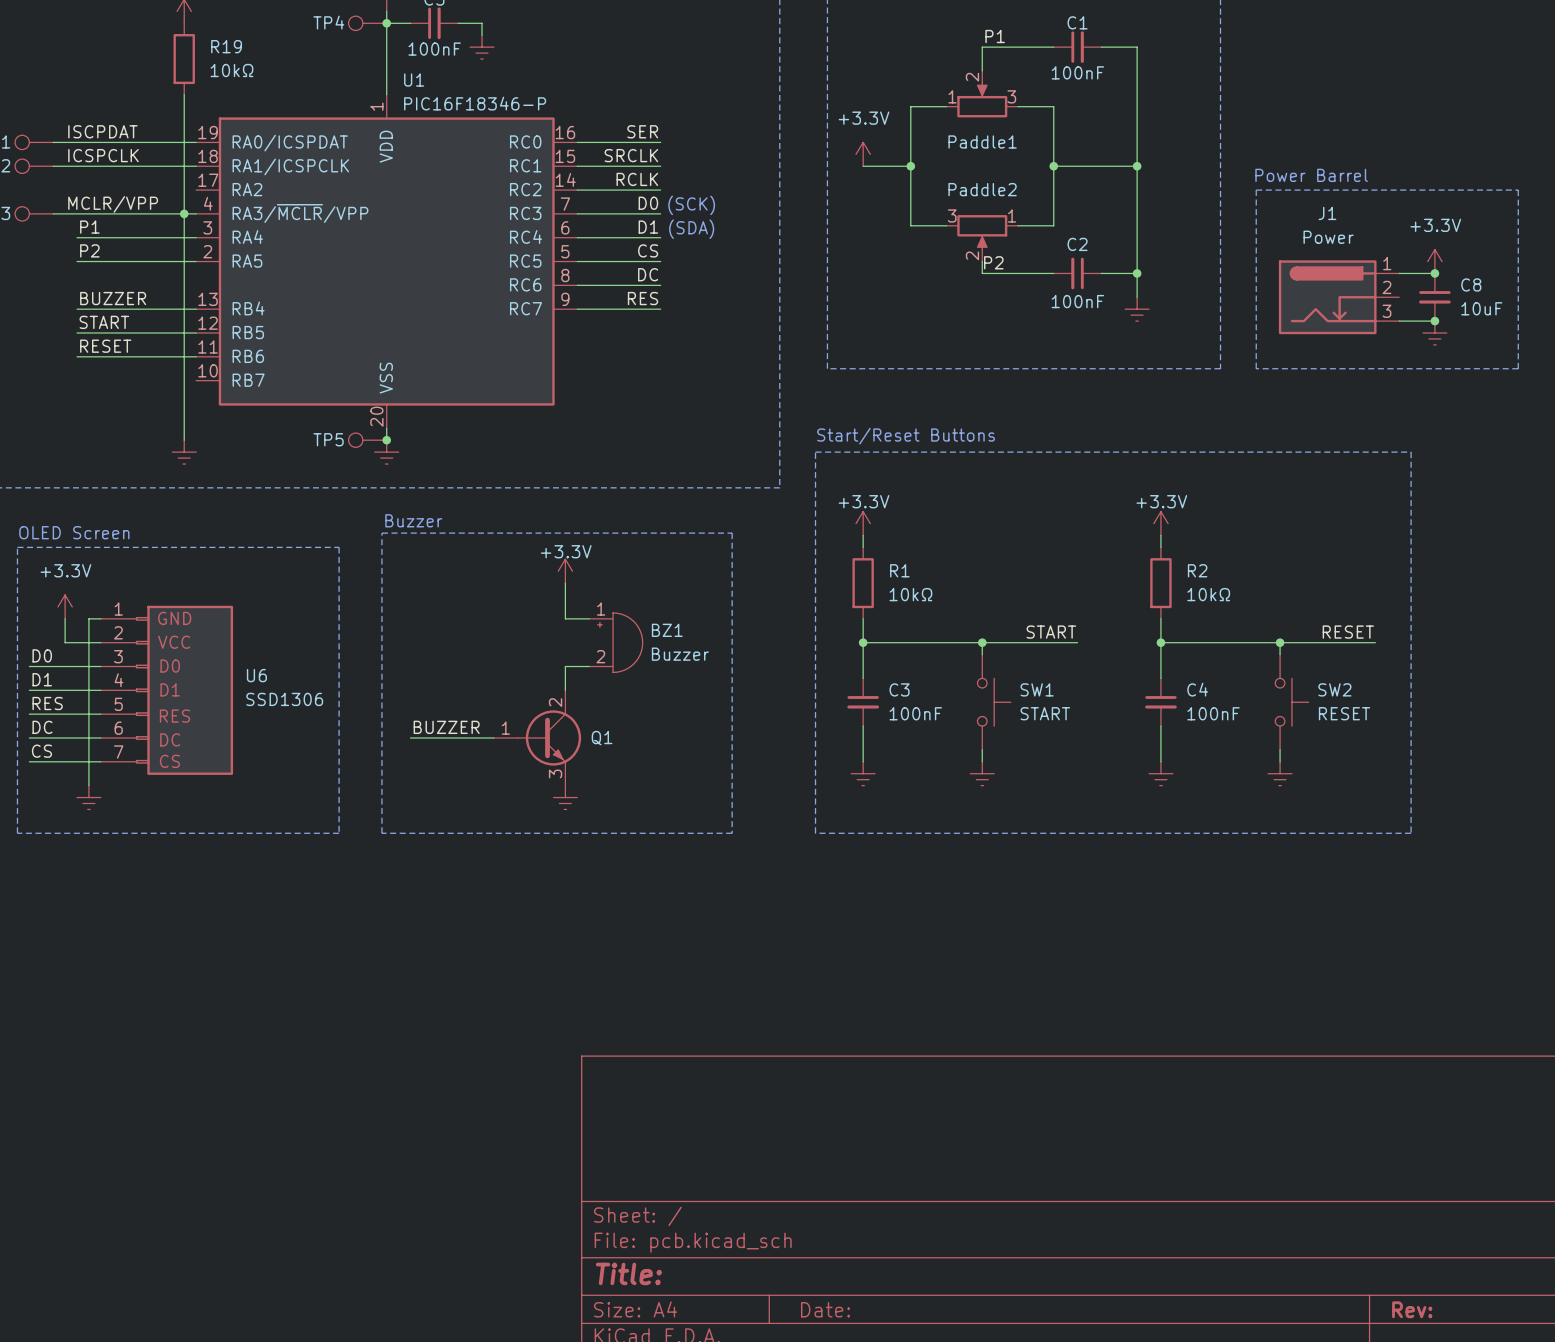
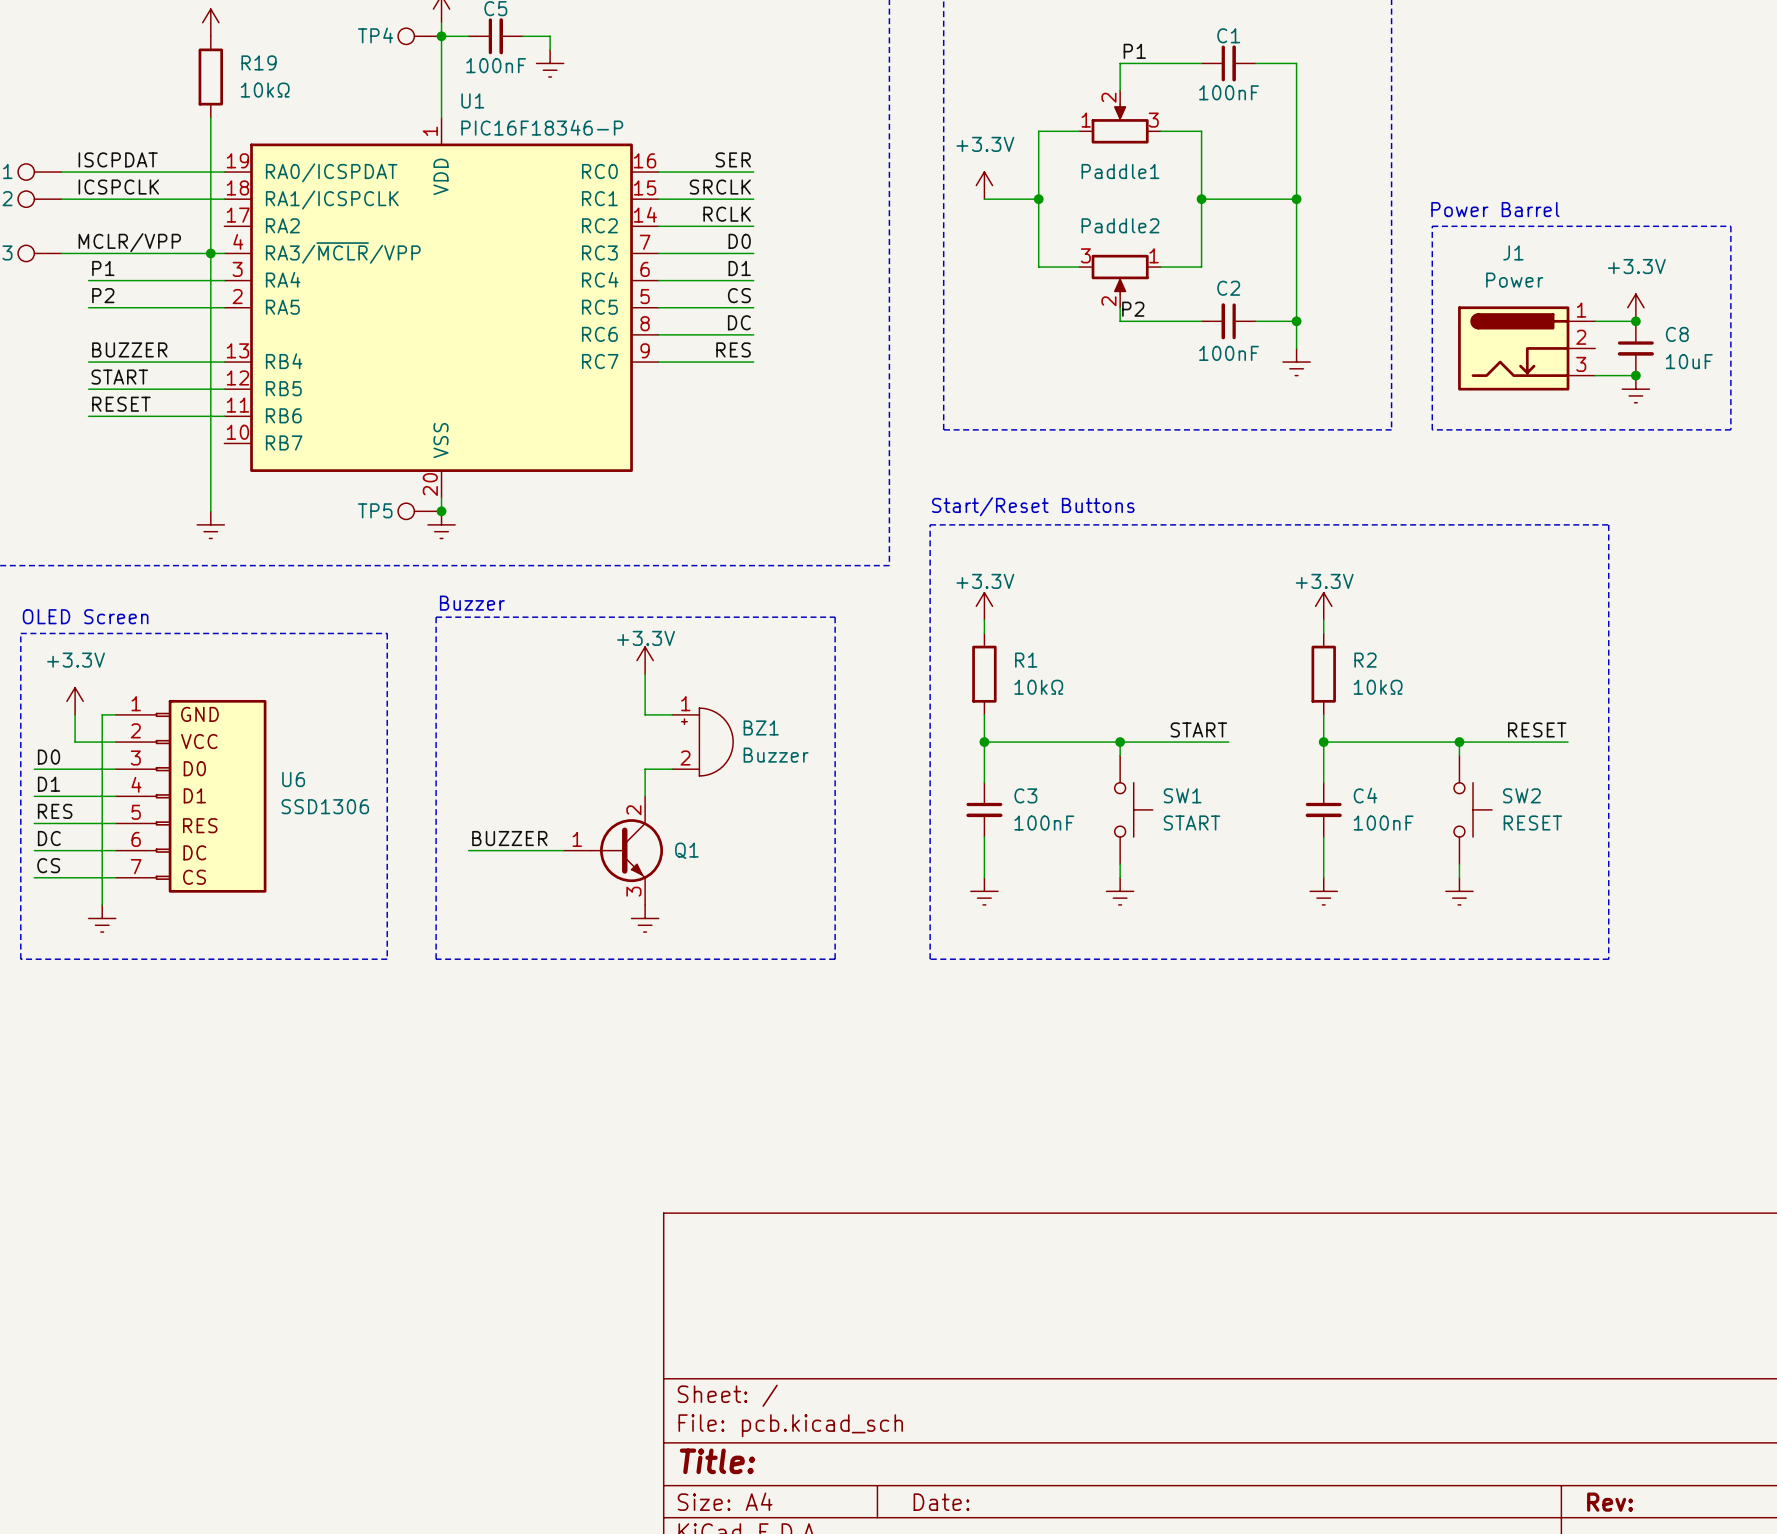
text: (SCK) (691, 205) -> none
text: (SDA) (691, 229) -> none

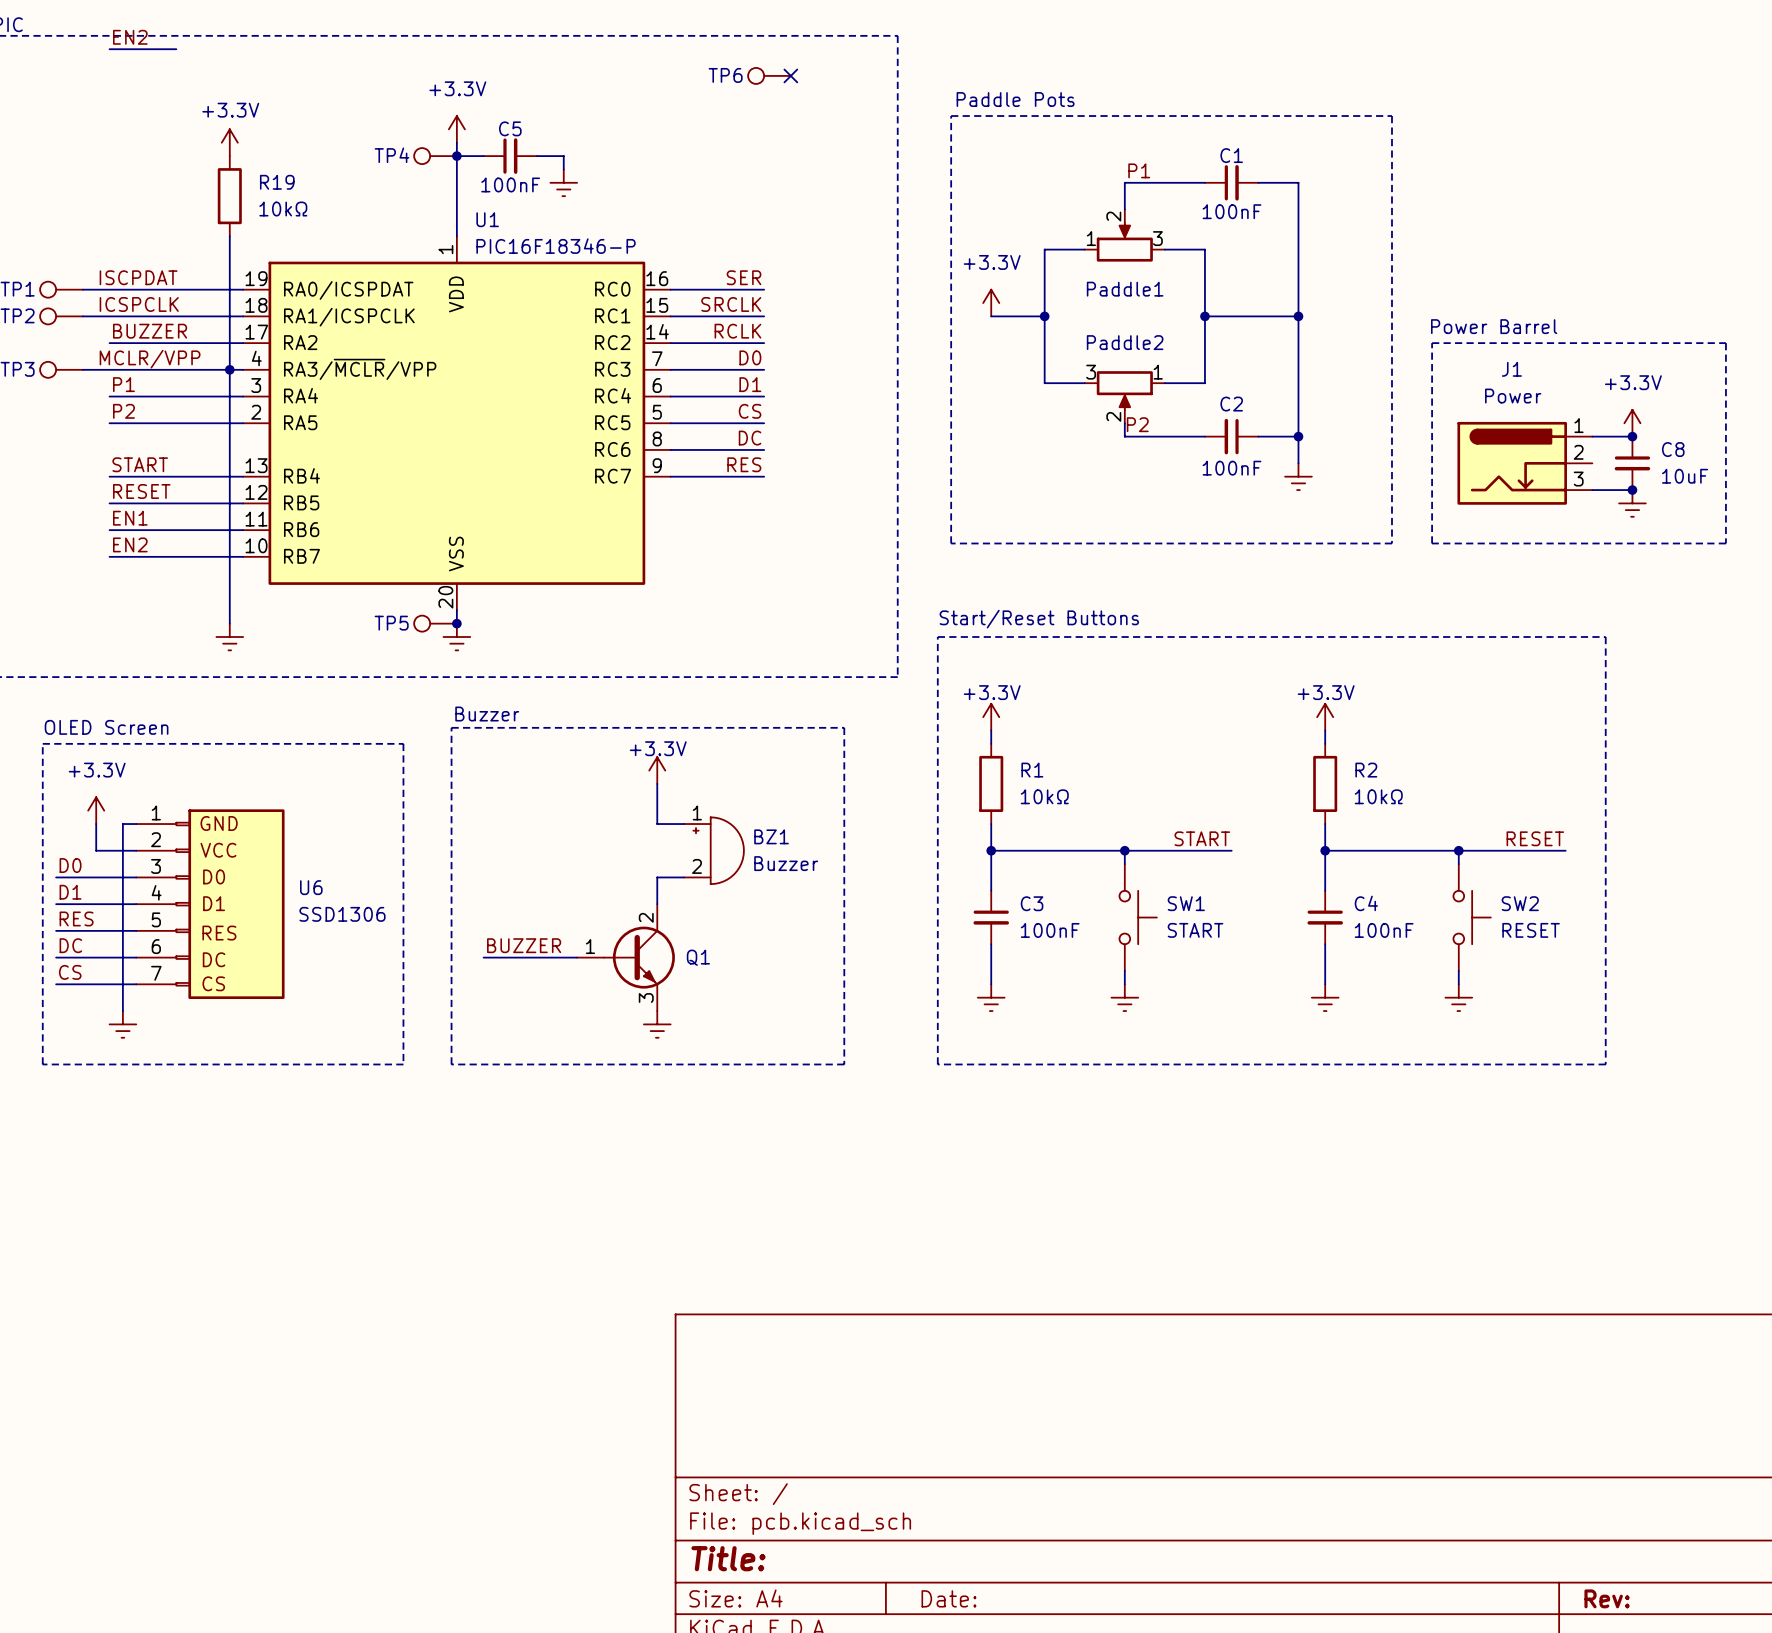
label: none -> BUZZER (150, 331)
wire: none -> (109, 343) (243, 343)
label: BUZZER (129, 349) -> START (140, 464)
label: START (119, 377) -> RESET (141, 491)
label: RESET (121, 404) -> EN1 (130, 518)
label: none -> EN2 (130, 544)
wire: none -> (109, 556) (243, 556)

